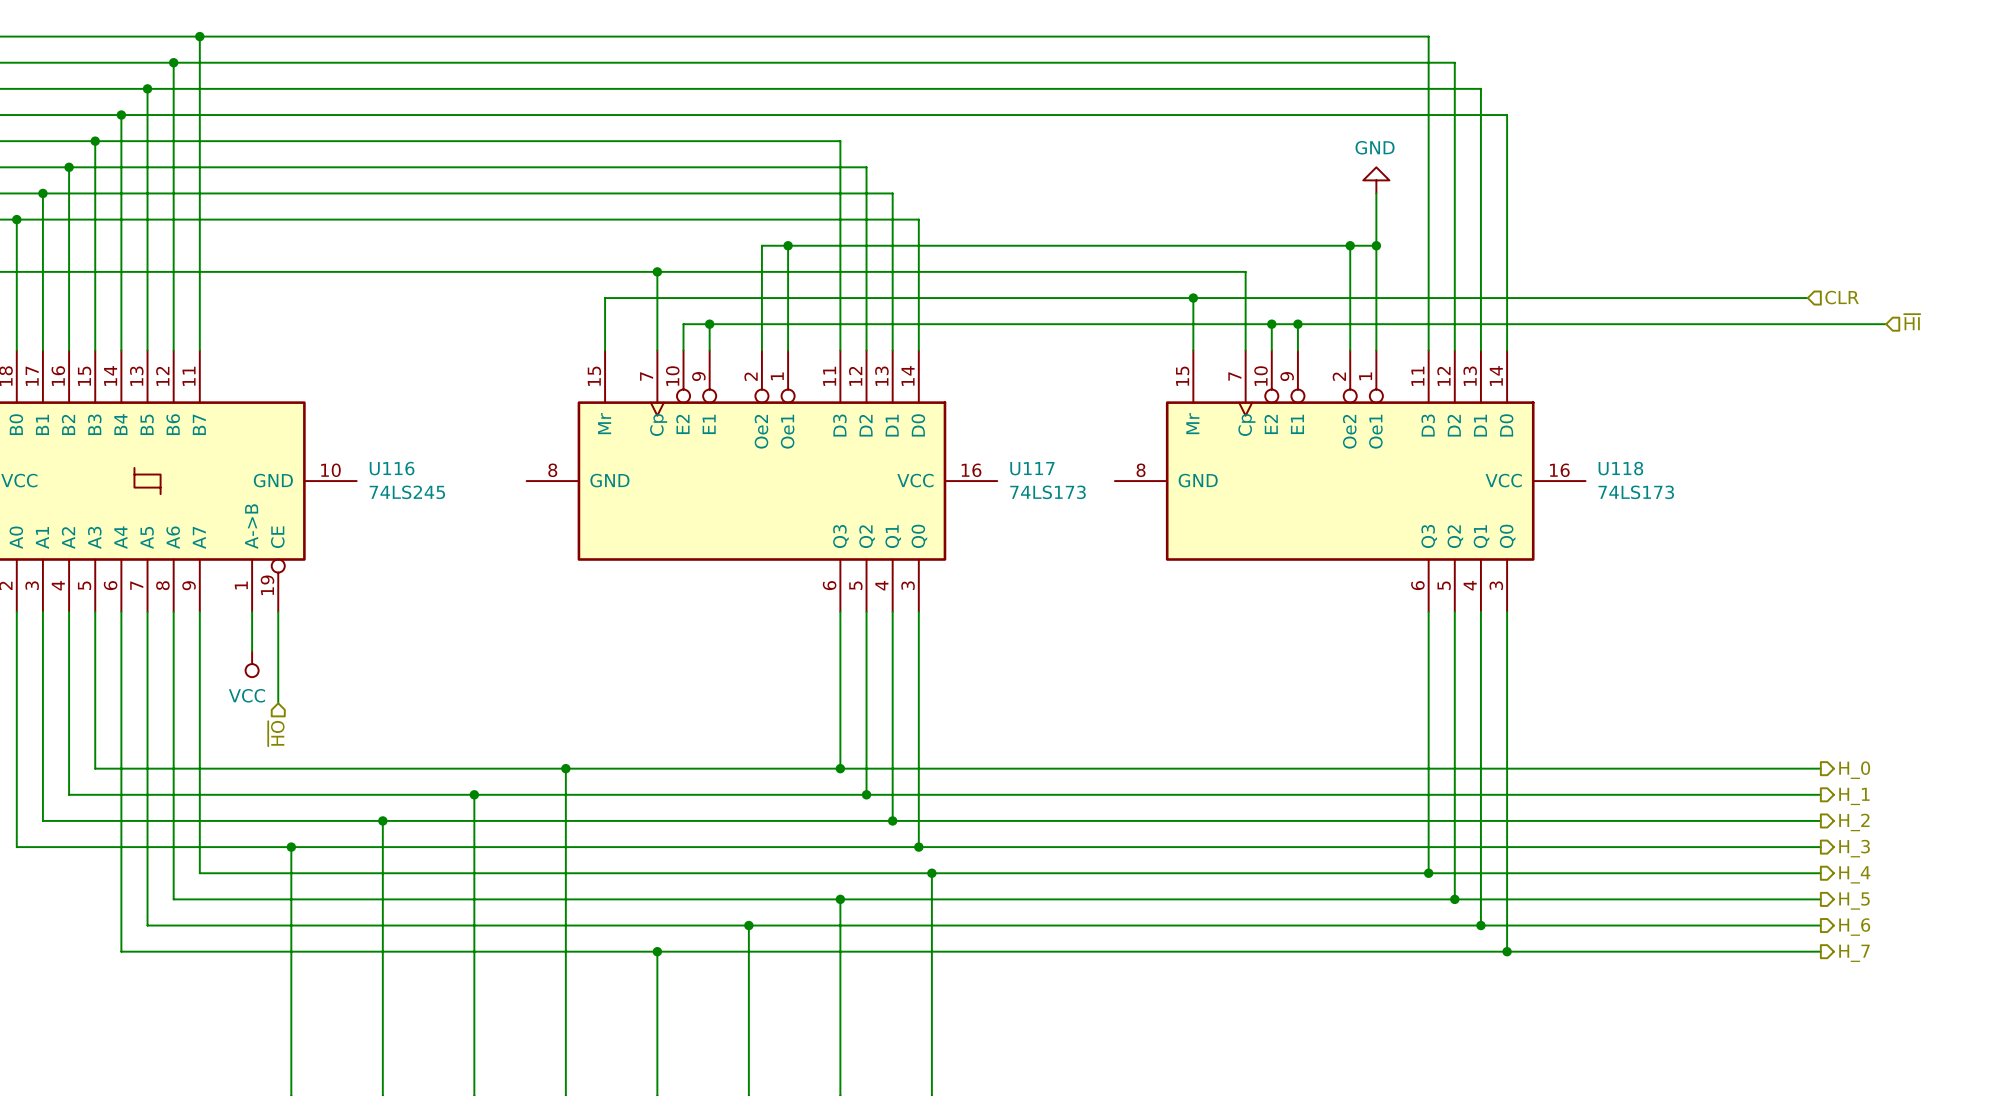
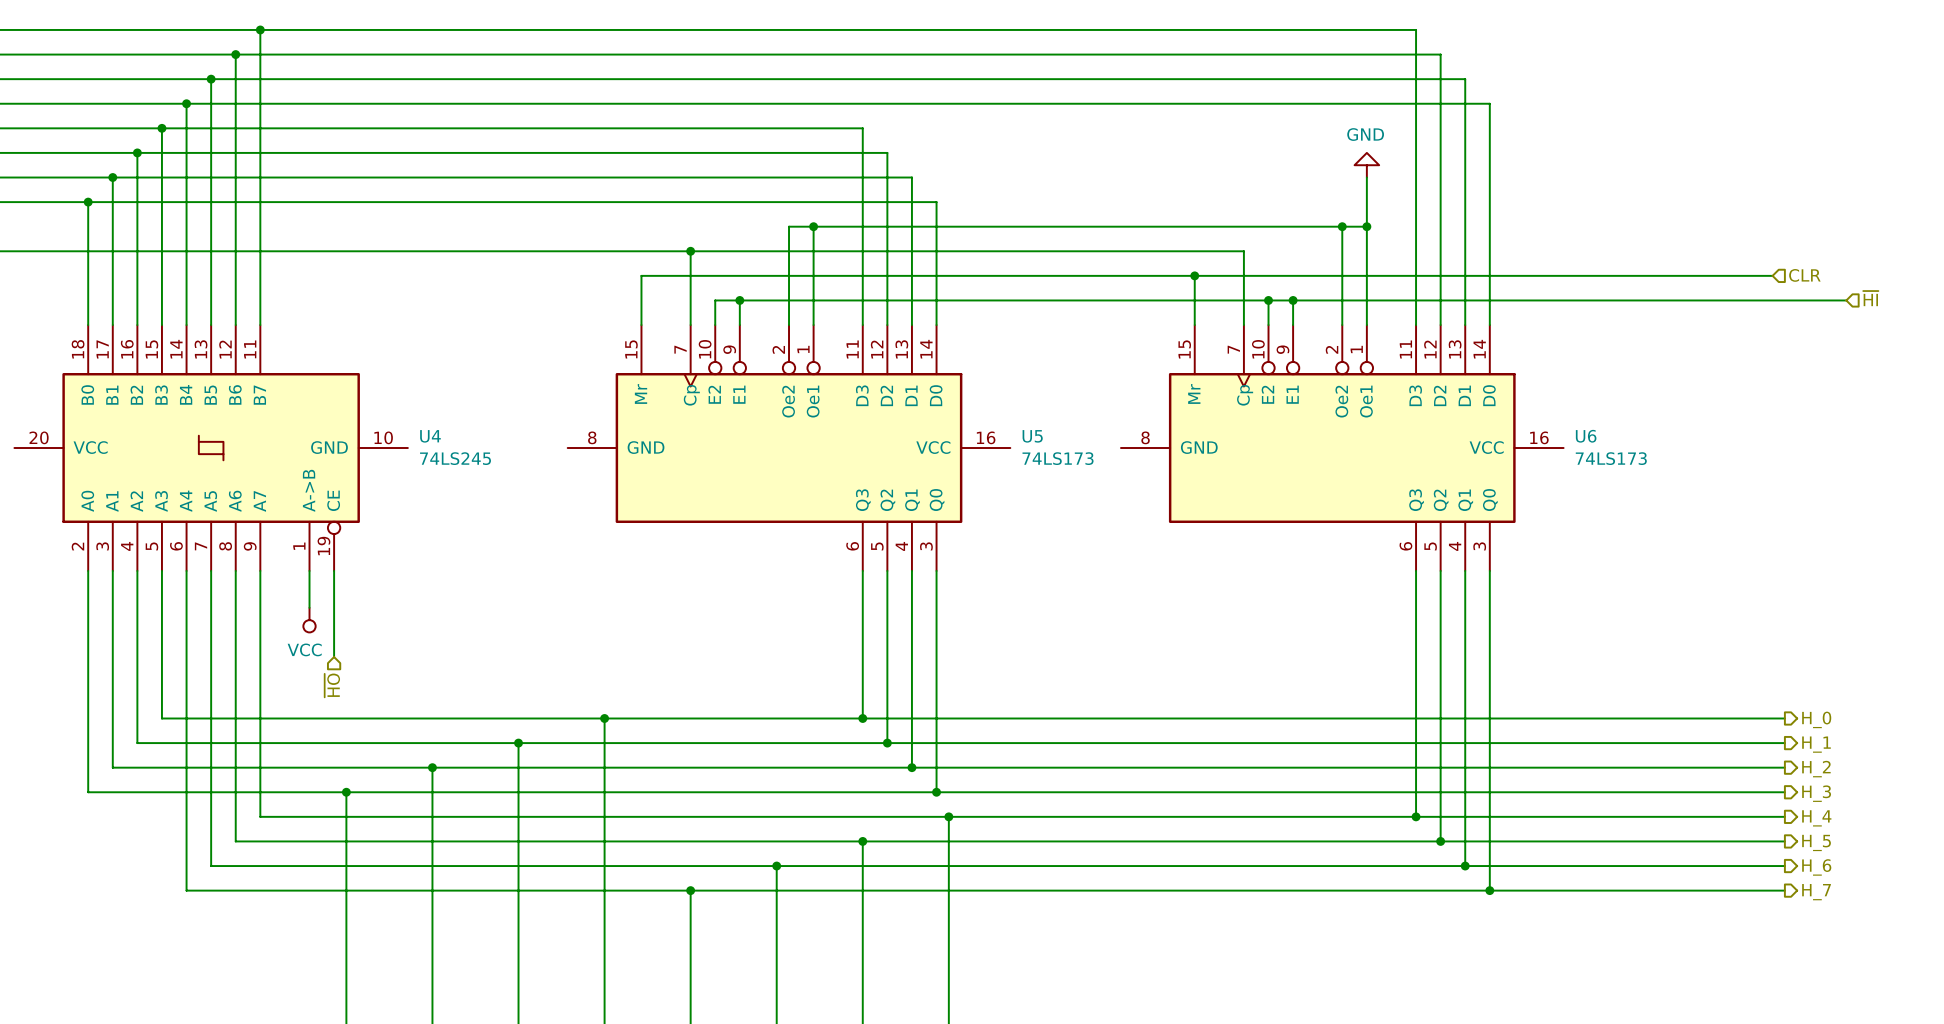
U116 name: U116 (392, 468) -> U4 (430, 436)
U117 name: U117 (1032, 468) -> U5 (1032, 436)
U118 name: U118 (1620, 468) -> U6 (1586, 436)

